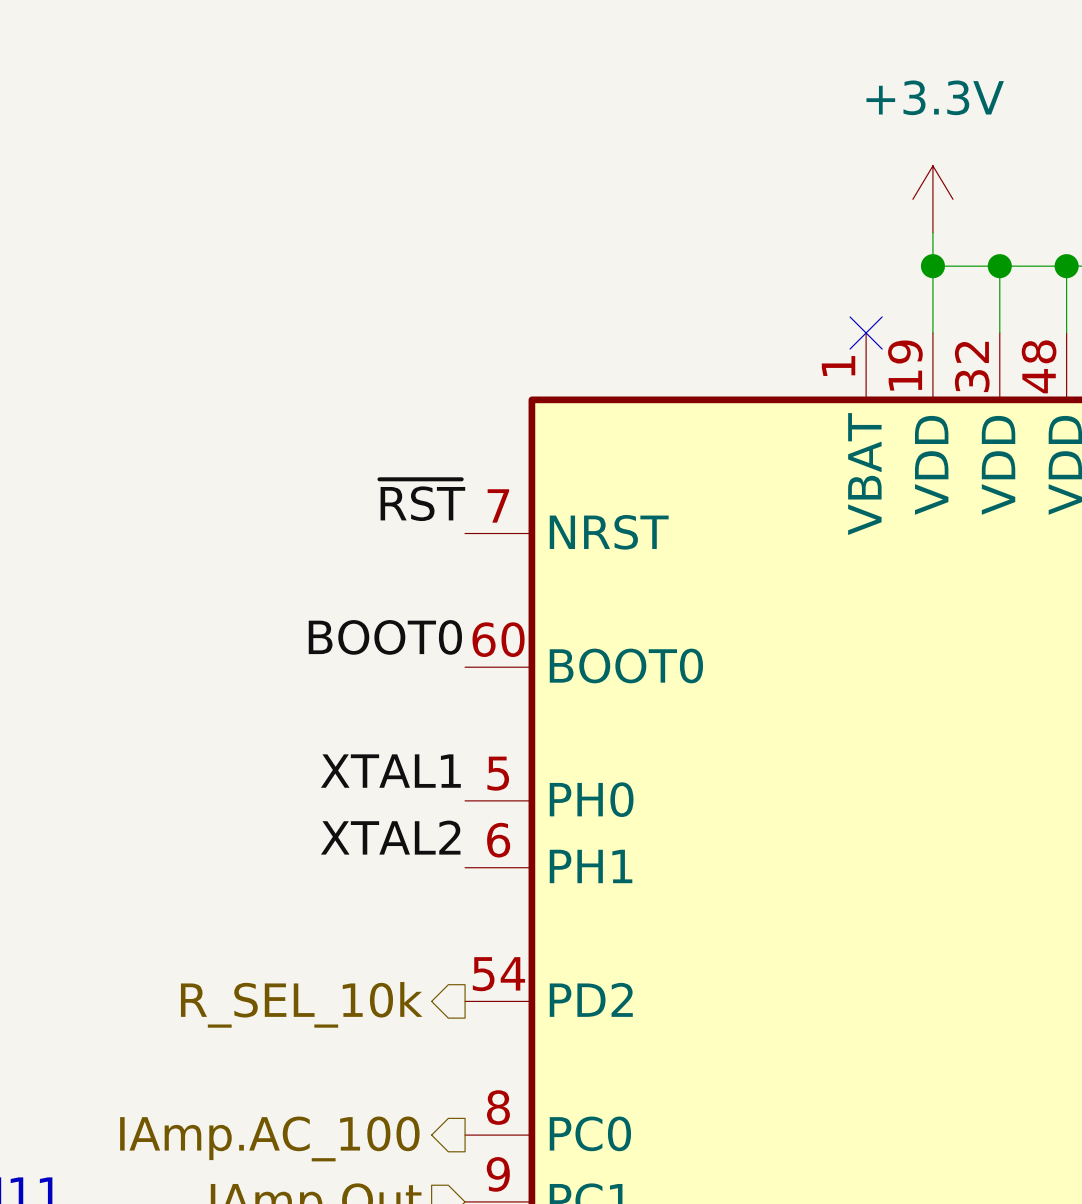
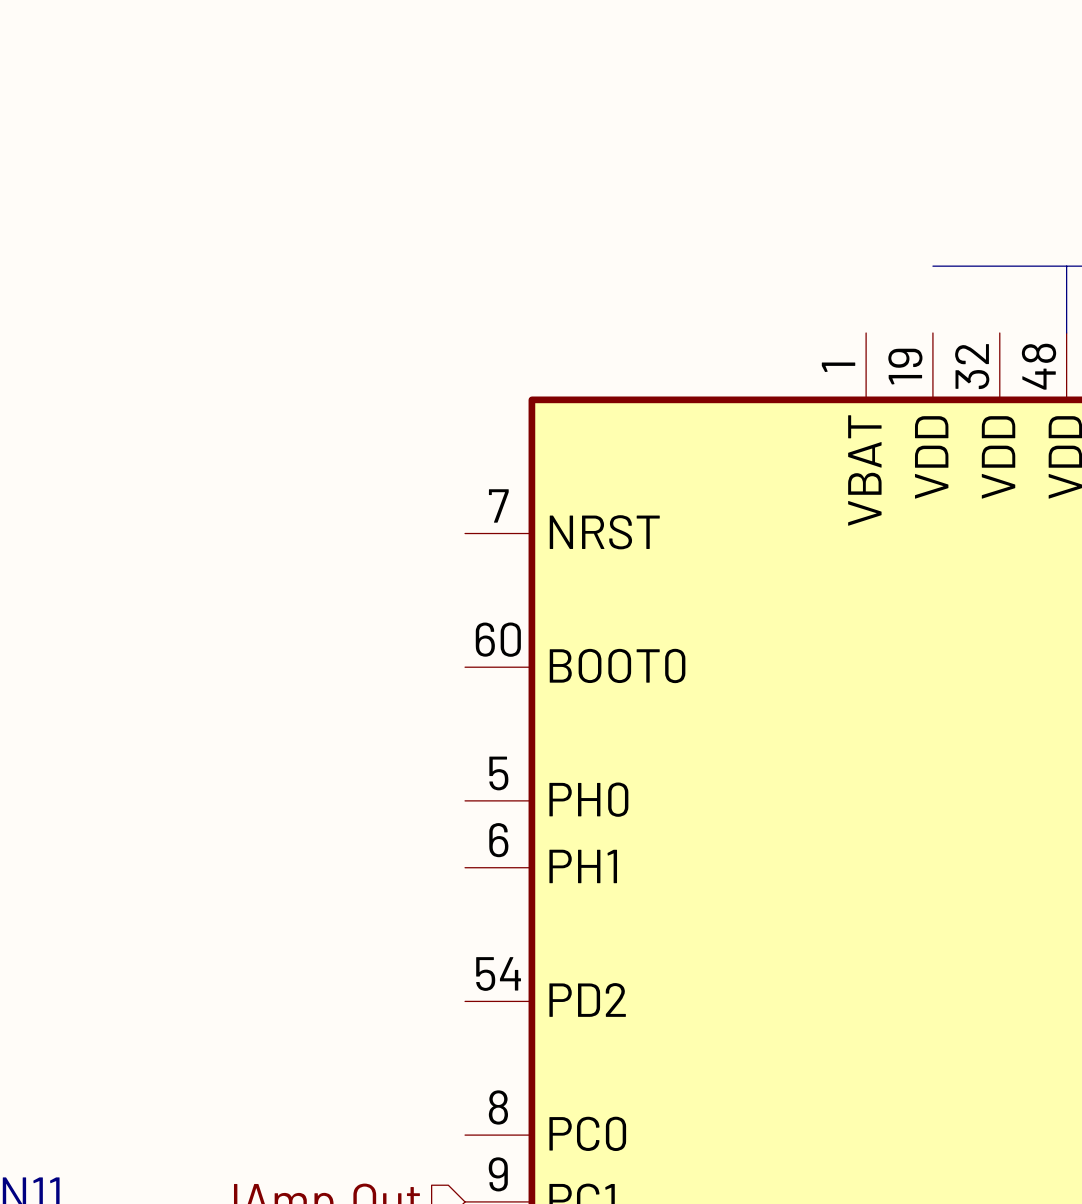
power symbol: +3.3V (932, 199) -> none
wire: (932, 232) (932, 332) -> none
junction: (932, 266) -> none
wire: (999, 266) (999, 332) -> none
junction: (999, 266) -> none
junction: (1066, 266) -> none
no-connect mark: (866, 332) -> none
label: ~{RST} (422, 500) -> none
label: BOOT0 (385, 637) -> none
label: XTAL1 (390, 771) -> none
label: XTAL2 (390, 837) -> none
hierarchical label: R_SEL_10k (301, 1004) -> none
hierarchical label: IAmp.AC_100 (269, 1138) -> none

